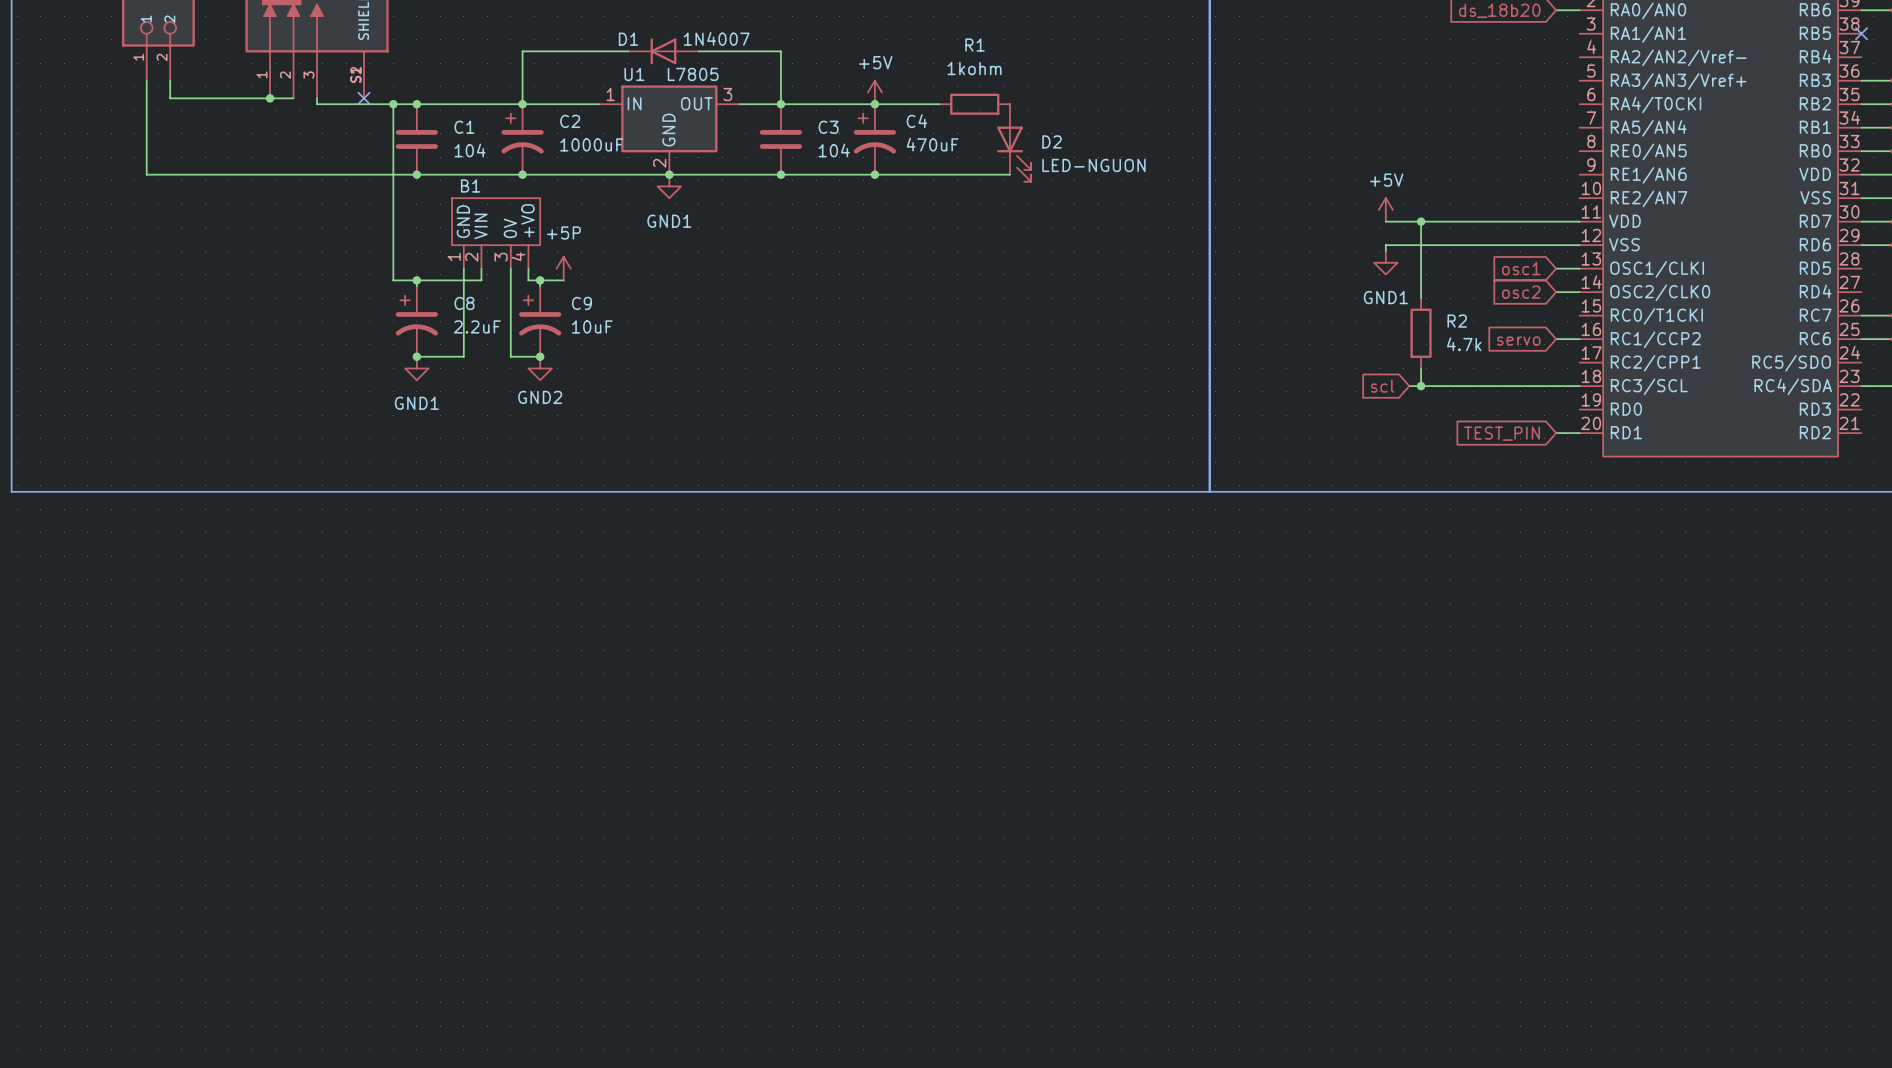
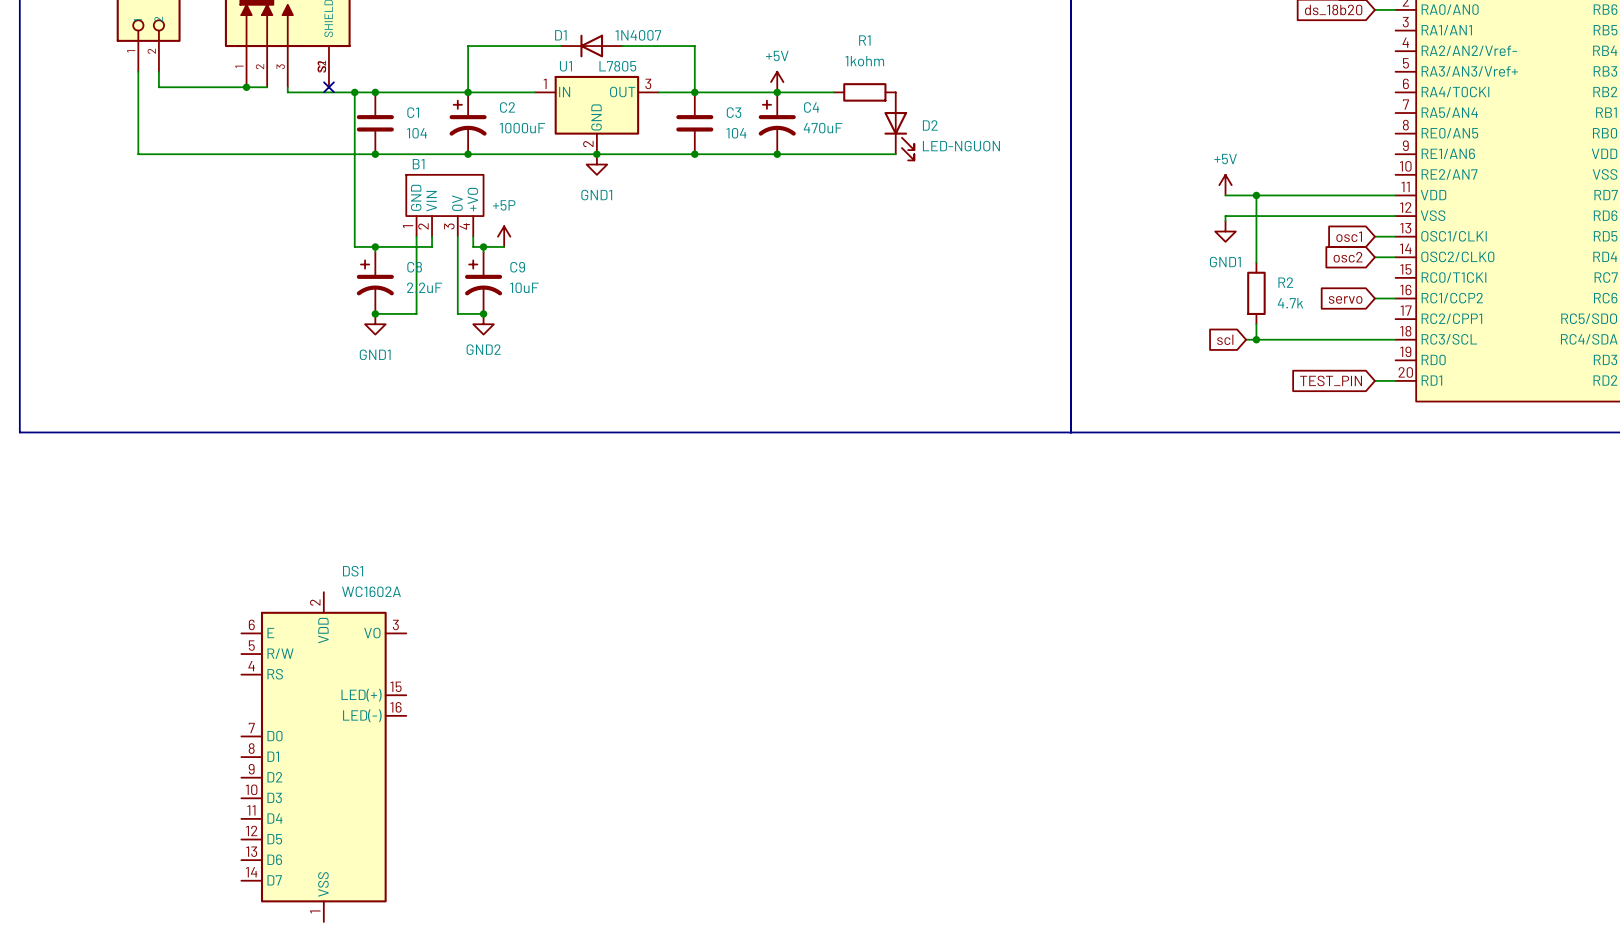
DS1: none -> WC1602A (323, 757)

